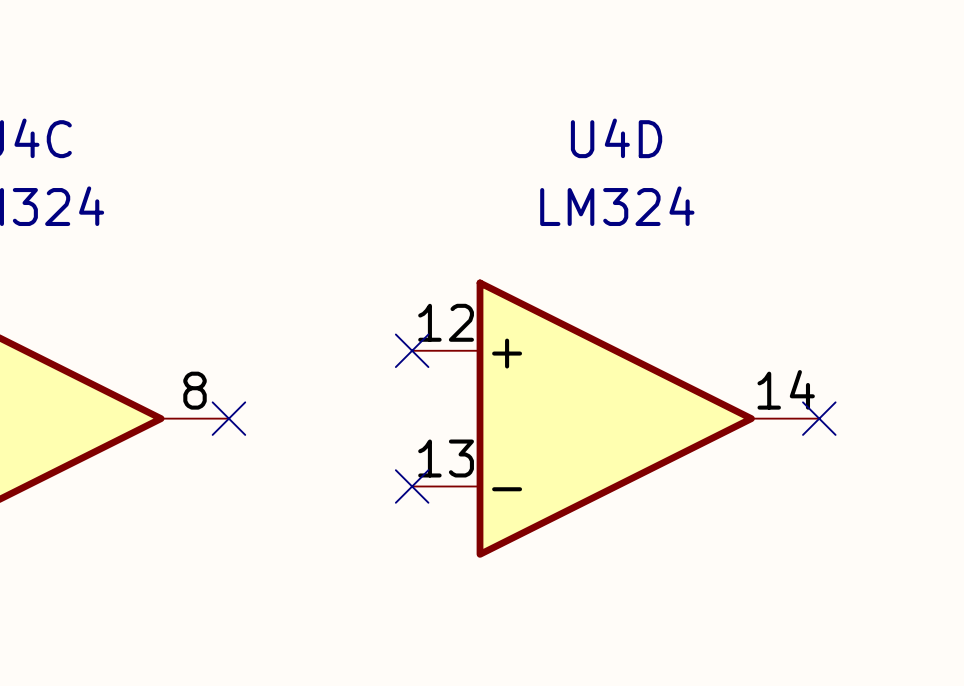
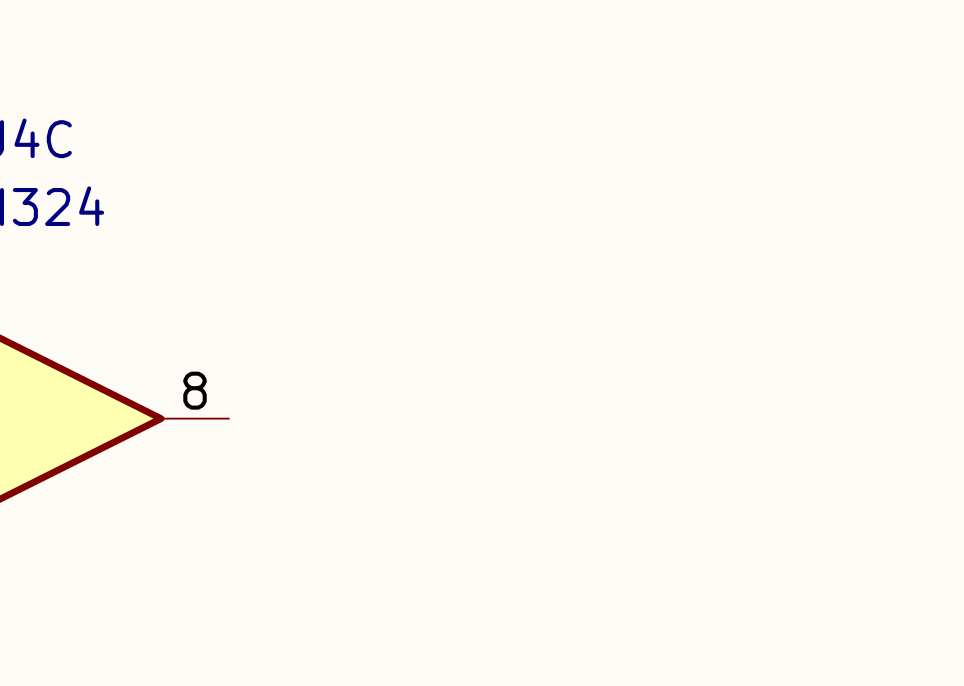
no-connect mark: (412, 350) -> none
no-connect mark: (228, 418) -> none
U4D: LM324 (615, 418) -> none
no-connect mark: (819, 418) -> none
no-connect mark: (412, 486) -> none

